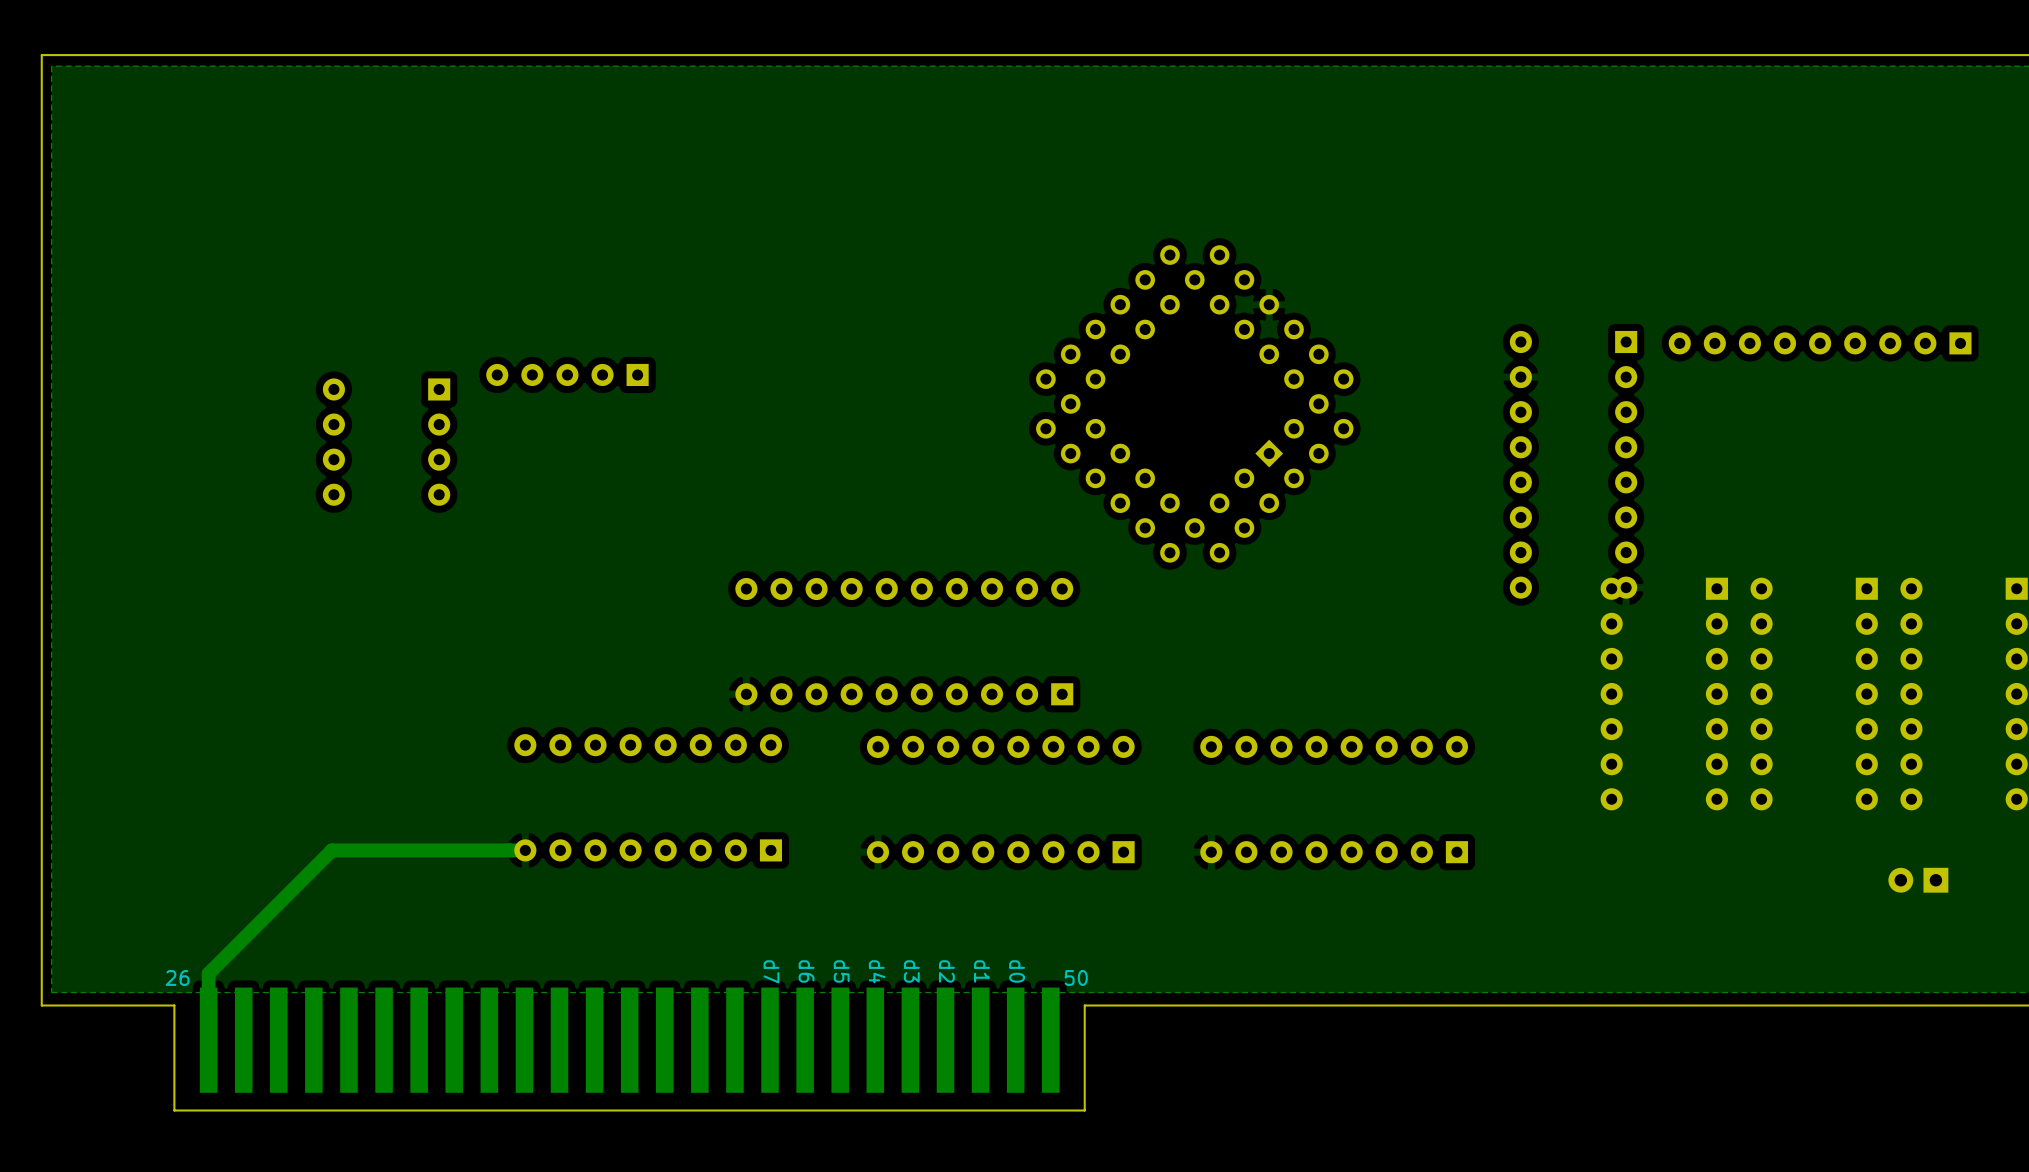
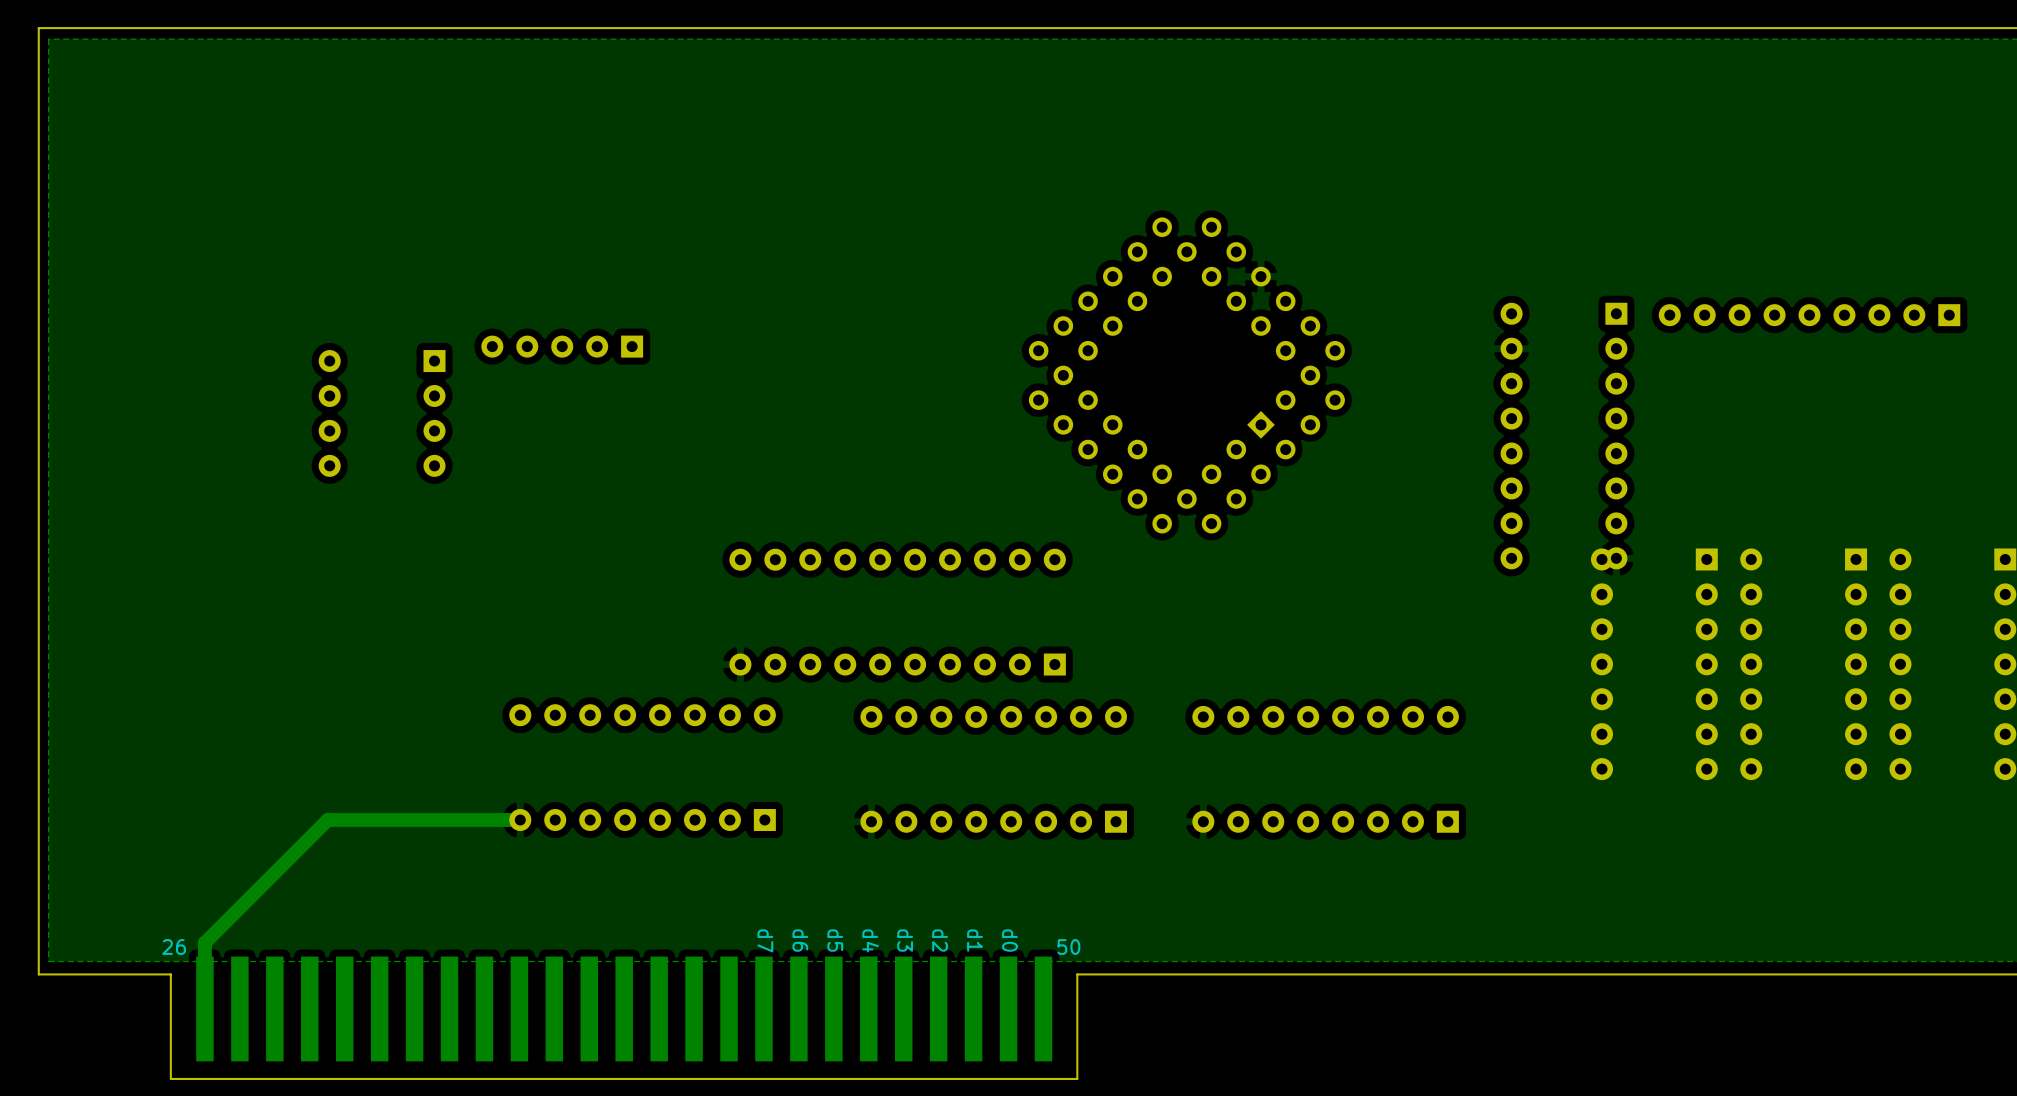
part: (1918, 880) -> none

